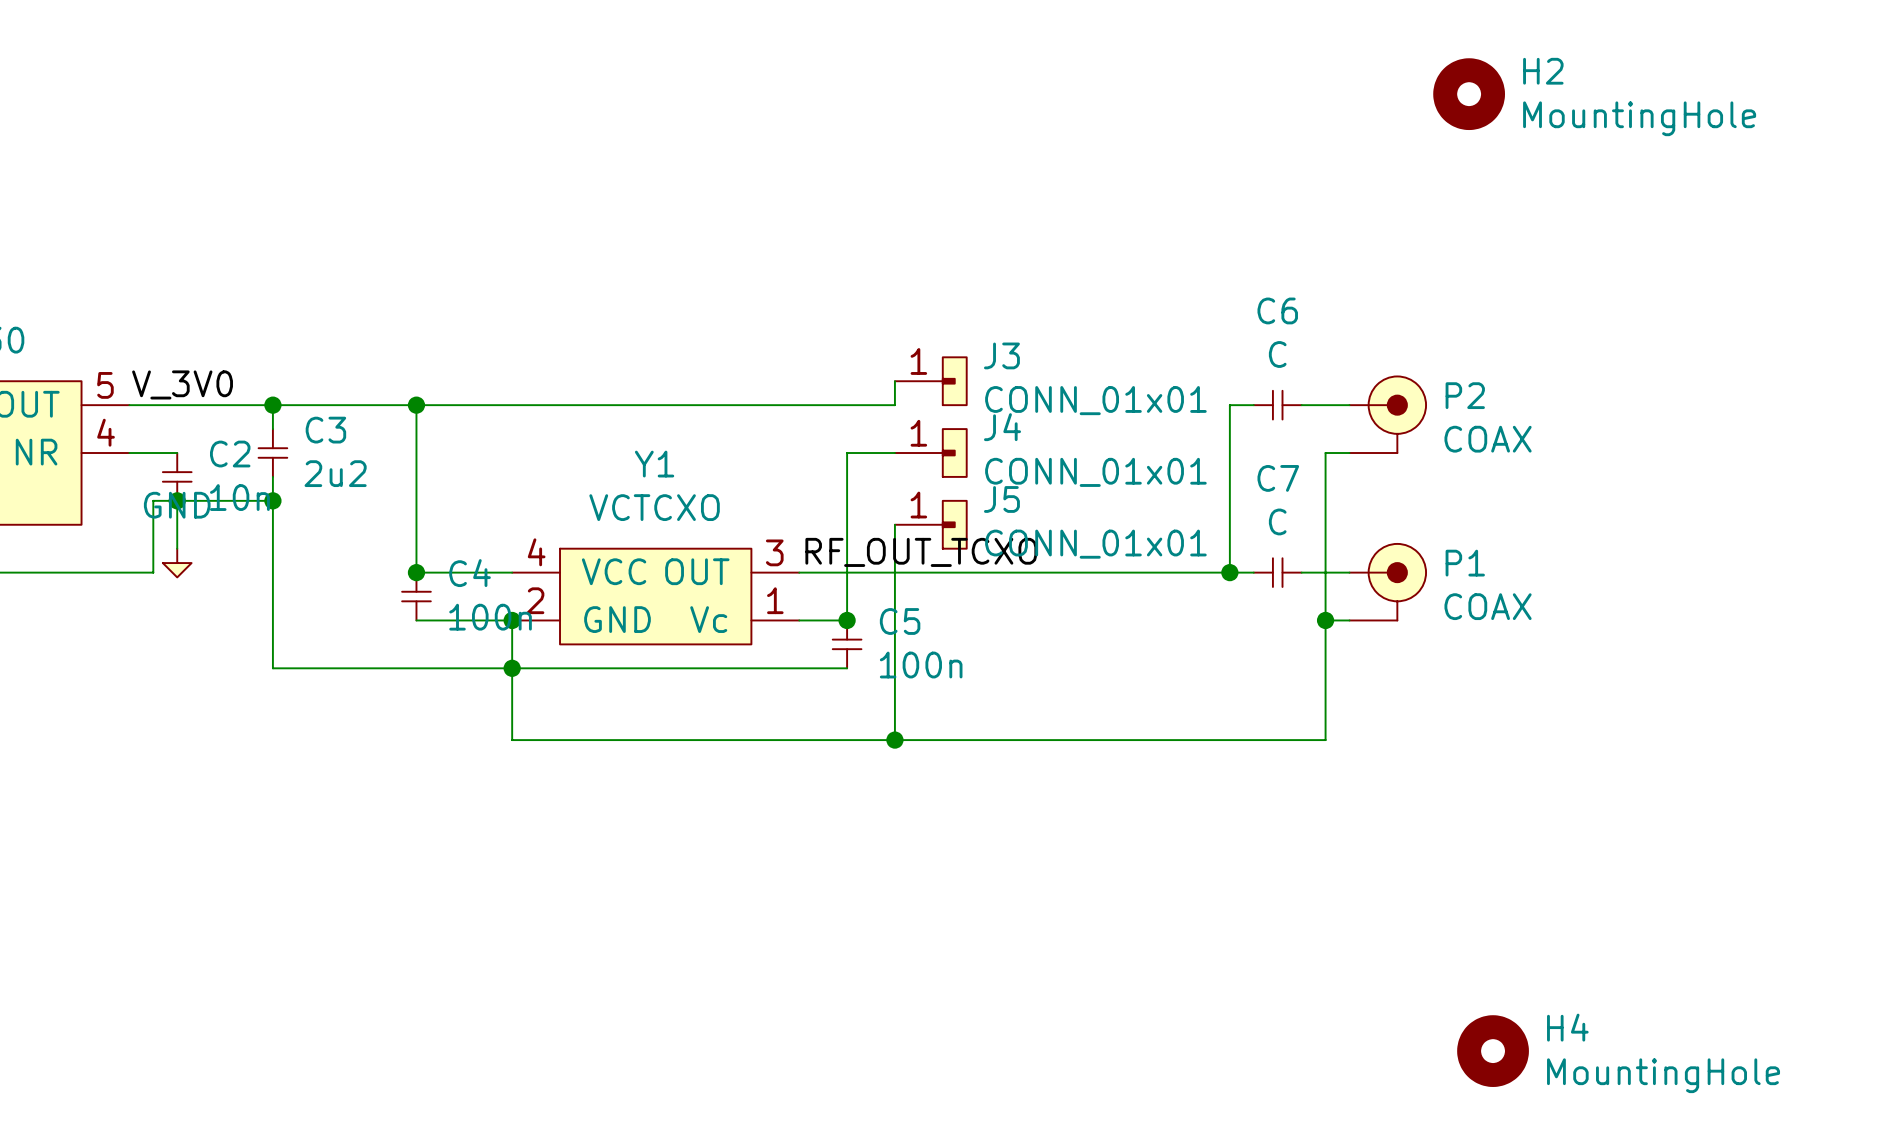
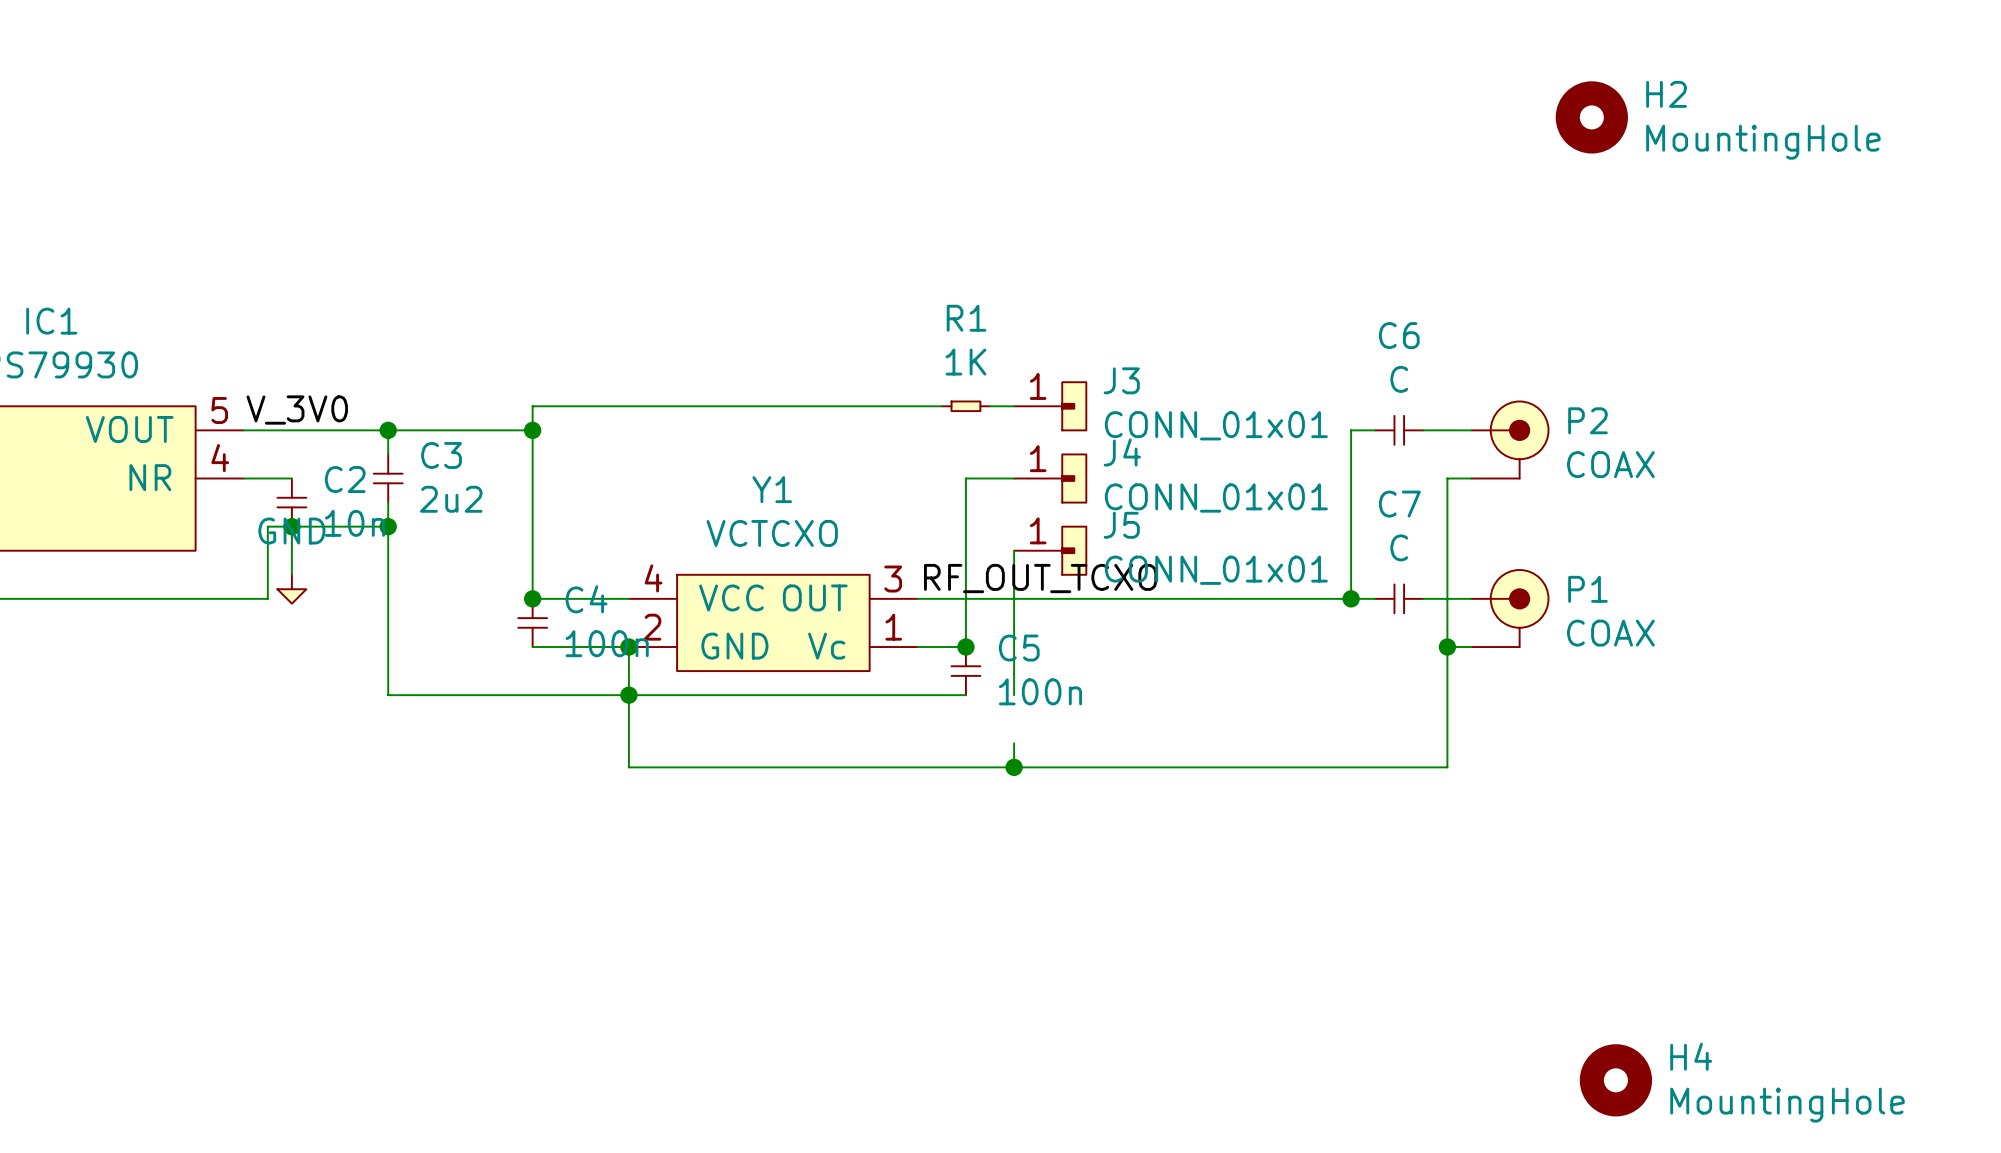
R1: none -> 1K (965, 406)
wire: none -> (990, 406) (1014, 406)
wire: (894, 381) (894, 405) (416, 405) -> (941, 406) (532, 406) (532, 430)
wire: (894, 668) (894, 716) -> none

